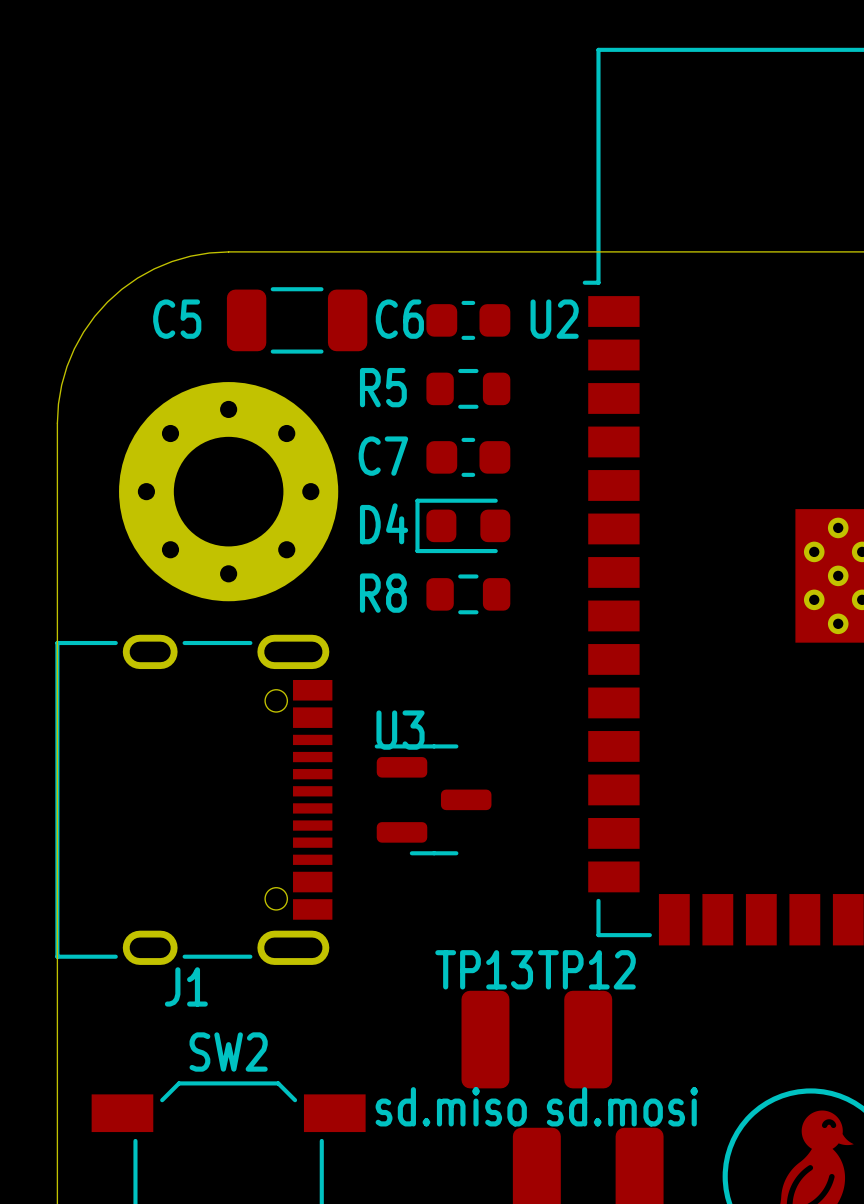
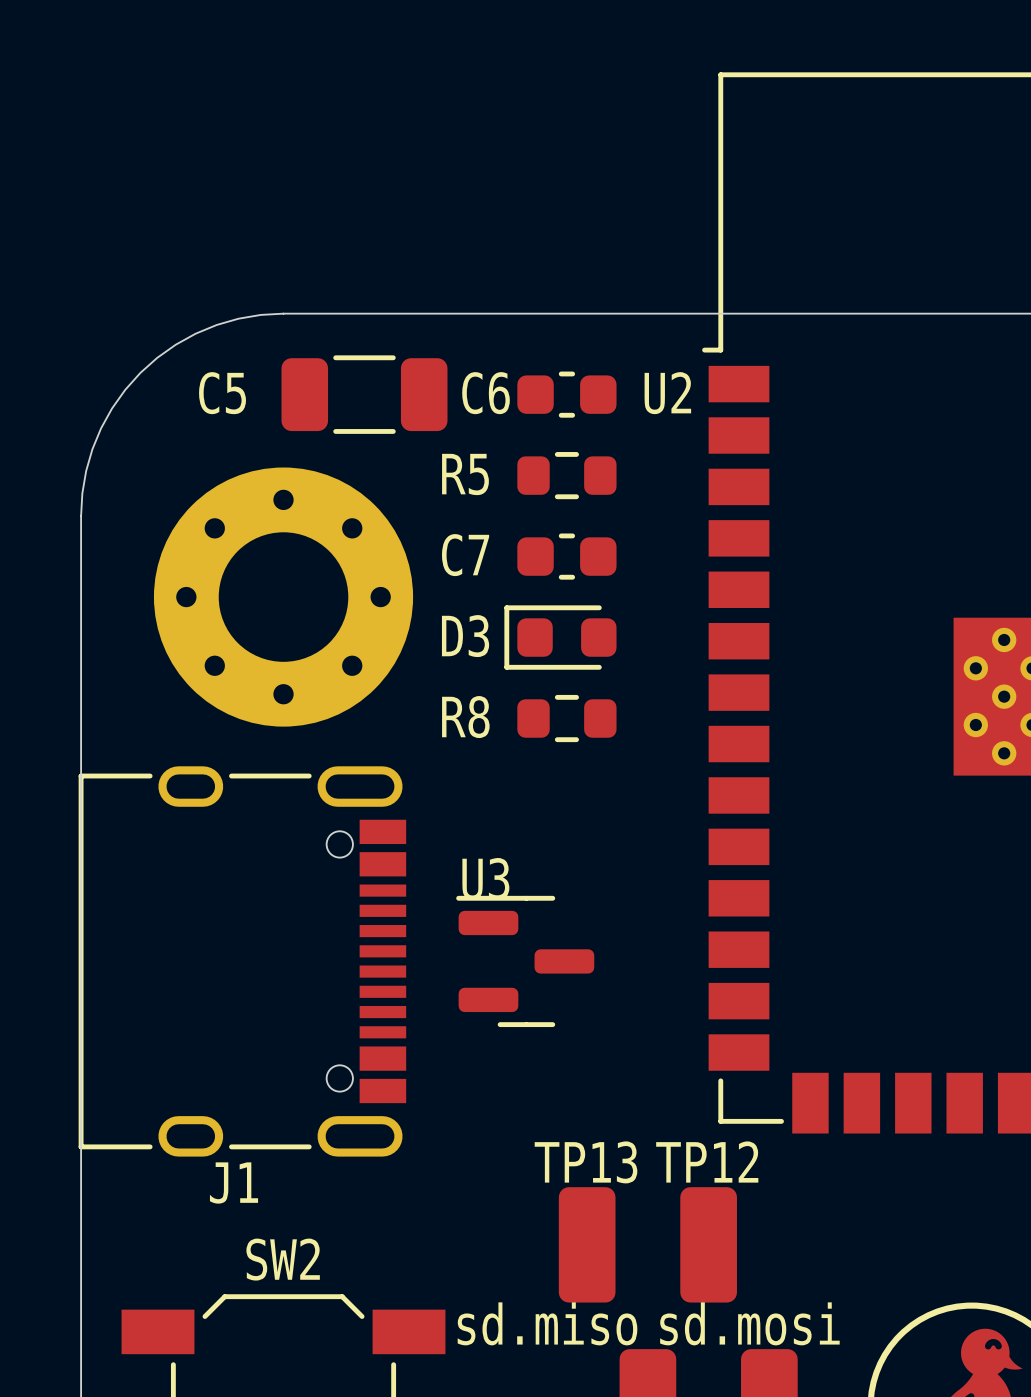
D4 name: D4 (384, 523) -> D3 (465, 636)

